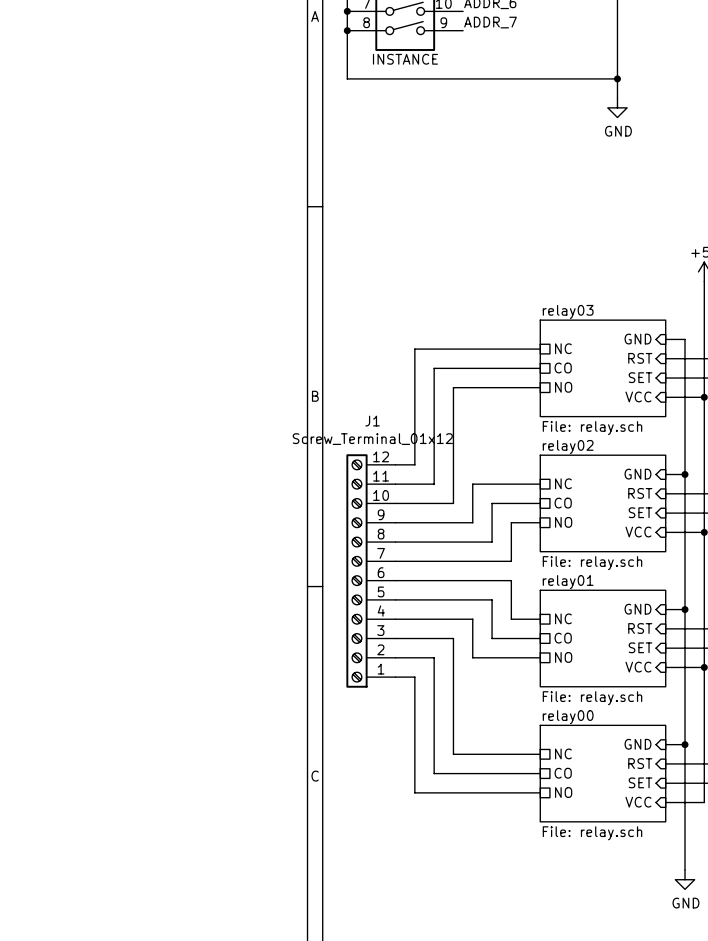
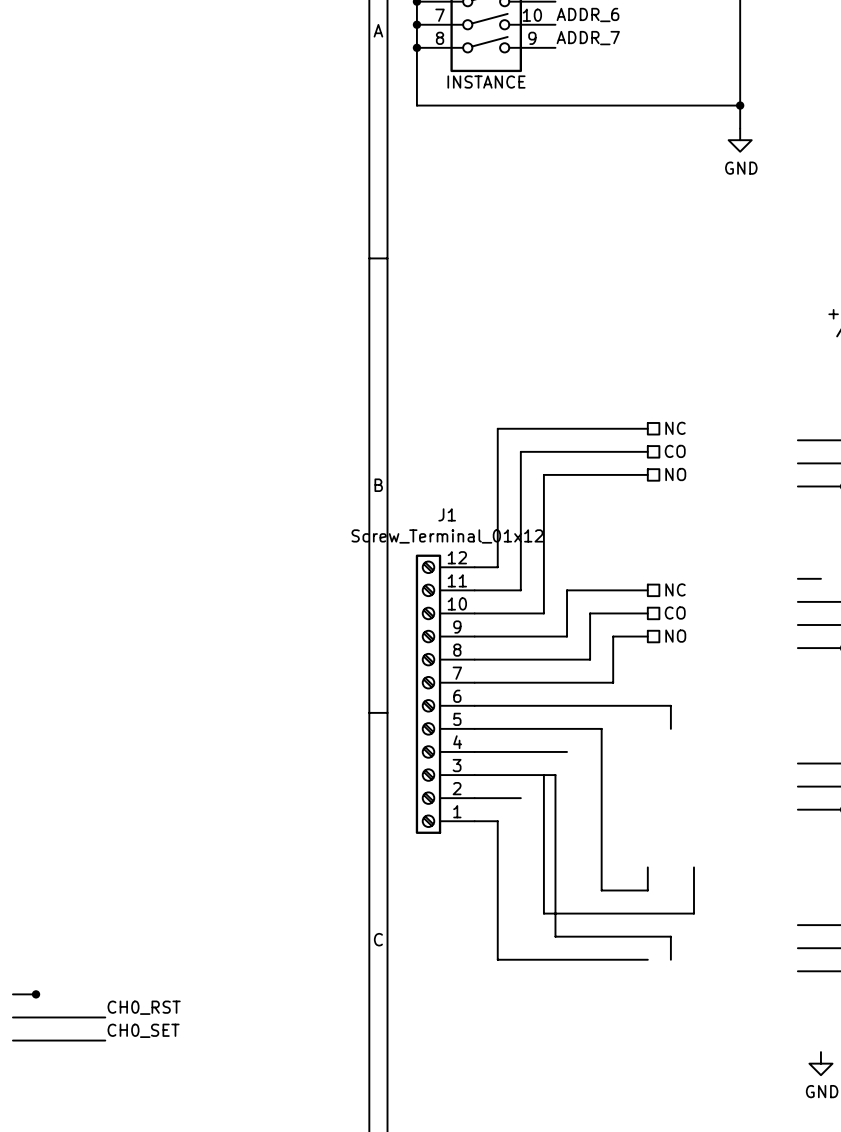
sheet pin: GND (637, 339) -> none
wire: (665, 339) (685, 339) (685, 870) -> none
sheet pin: RST (640, 358) -> none
sheet relay03: File: relay.sch (603, 368) -> none
sheet pin: SET (640, 377) -> none
sheet pin: VCC (638, 396) -> none
sheet pin: GND (637, 474) -> none
junction: (685, 474) -> none
sheet pin: RST (640, 493) -> none
sheet relay02: File: relay.sch (603, 503) -> none
sheet pin: SET (640, 512) -> none
sheet pin: VCC (638, 532) -> none
wire: (511, 580) (511, 619) (540, 619) -> (613, 705) (670, 705) (670, 728)
wire: (492, 599) (492, 638) (540, 638) -> (590, 728) (601, 728) (601, 890) (647, 890) (647, 867)
sheet pin: GND (637, 609) -> none
wire: (665, 609) (685, 609) -> none
junction: (685, 609) -> none
sheet pin: NC (563, 618) -> none
wire: (472, 619) (472, 657) (540, 657) -> none
sheet pin: RST (640, 628) -> none
sheet pin: CO (563, 638) -> none
sheet relay01: File: relay.sch (603, 638) -> none
sheet pin: SET (640, 647) -> none
wire: (434, 657) (434, 773) (463, 773) -> (543, 775) (555, 775) (555, 936)
sheet pin: NO (563, 657) -> none
sheet pin: VCC (638, 667) -> none
wire: none -> (693, 867) (693, 913) (647, 913)
sheet pin: GND (637, 744) -> none
wire: (665, 744) (685, 744) -> none
junction: (685, 744) -> none
sheet pin: NC (563, 753) -> none
sheet pin: RST (640, 763) -> none
wire: none -> (647, 936) (670, 936) (670, 959)
sheet pin: CO (563, 773) -> none
sheet relay00: File: relay.sch (603, 773) -> none
sheet pin: SET (640, 782) -> none
sheet pin: NO (563, 792) -> none
sheet pin: VCC (638, 802) -> none
wire: none -> (12, 994) (36, 994)
junction: none -> (36, 994)
label: none -> CH0_RST (144, 1007)
wire: none -> (12, 1017) (105, 1017)
label: none -> CH0_SET (143, 1030)
wire: none -> (12, 1040) (105, 1040)

